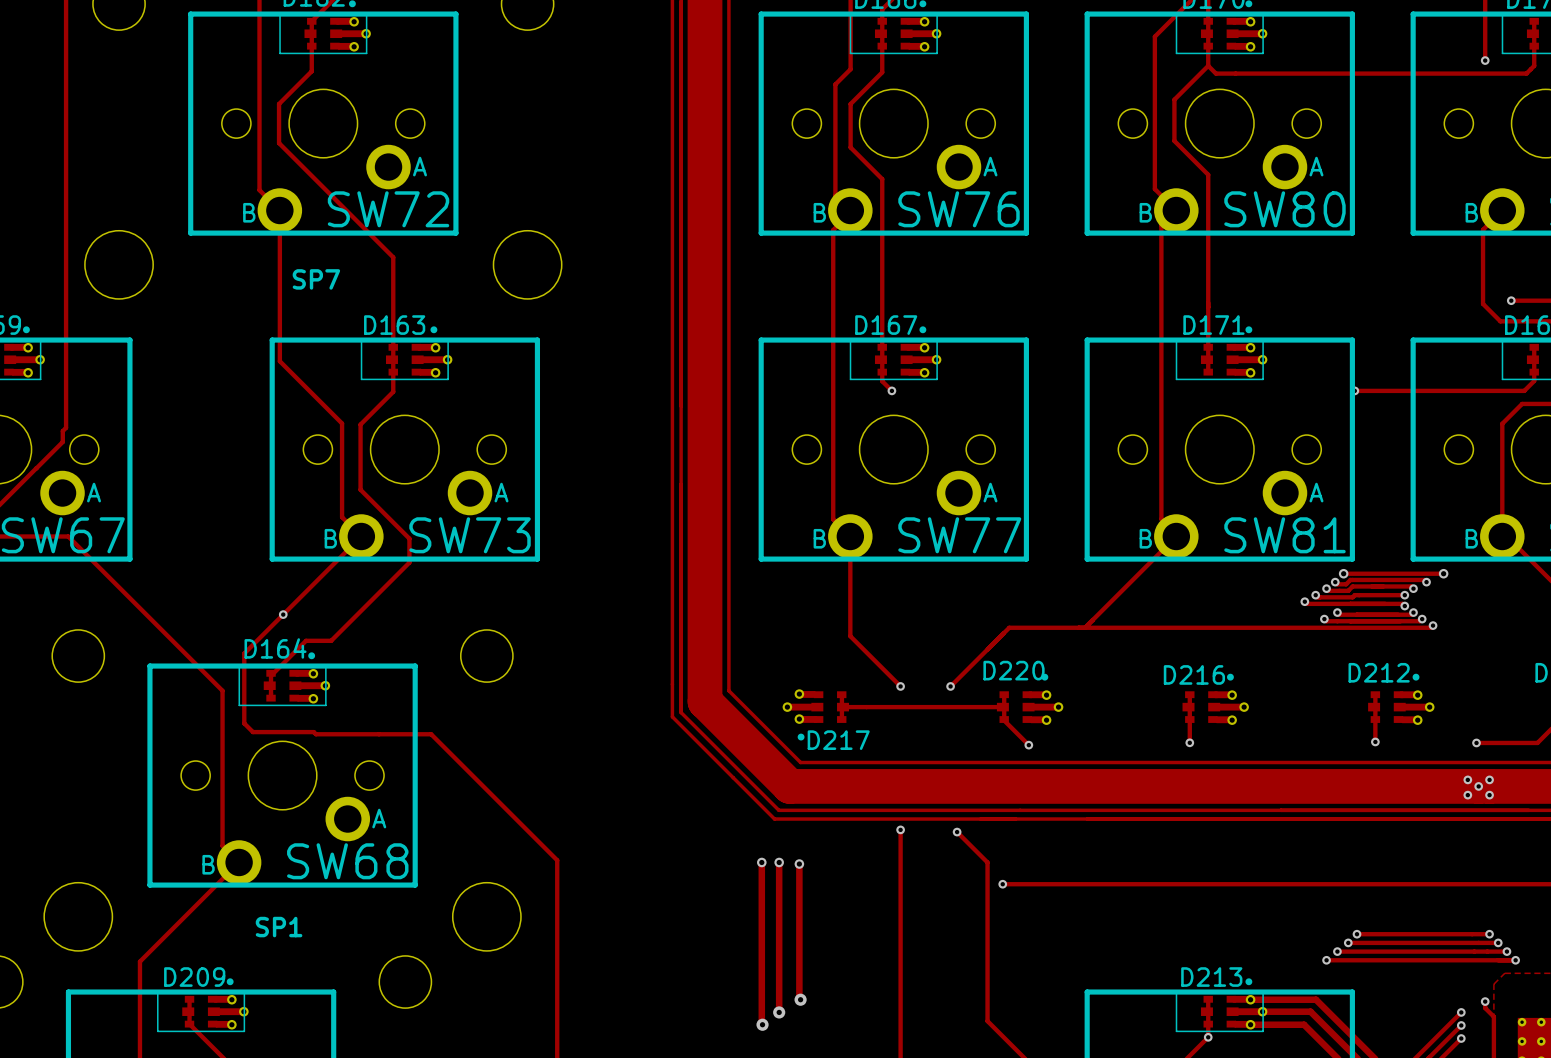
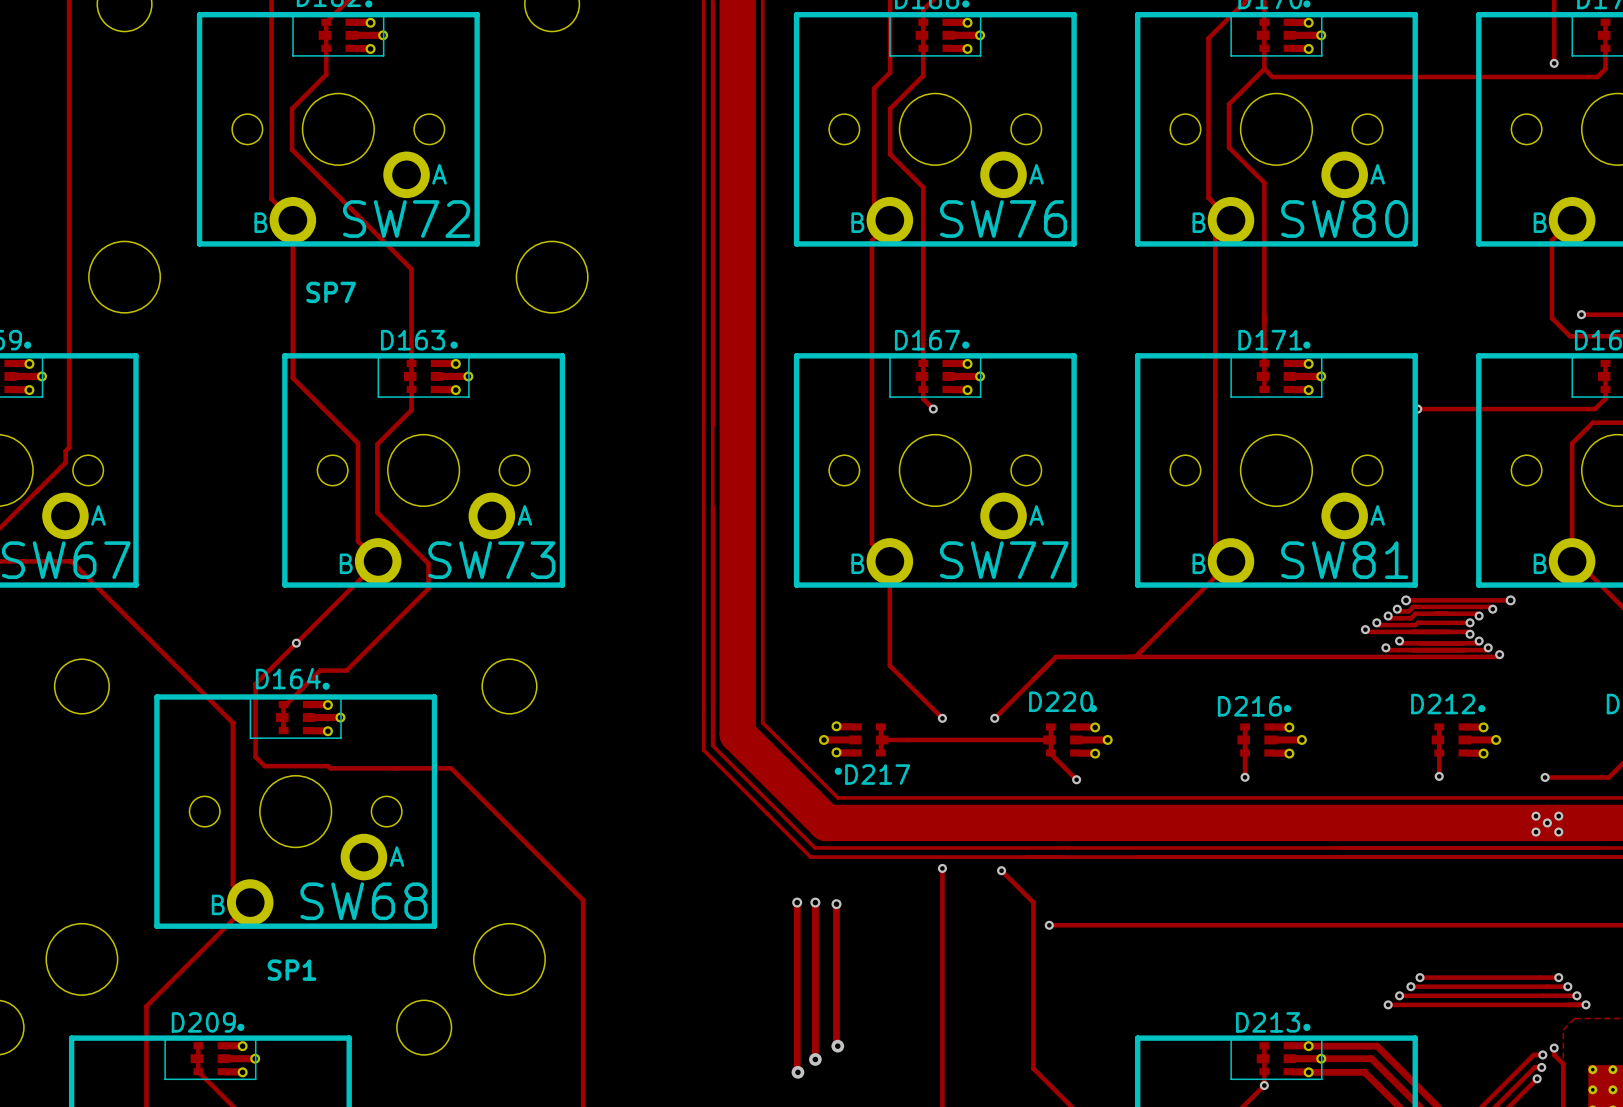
track: none -> (1542, 1054) (1533, 1054) (1529, 1059)
via: none -> (1542, 1054)
via: (1461, 1012) -> none
track: none -> (1541, 1067) (1534, 1067) (1529, 1073)
via: none -> (1541, 1067)
via: (1461, 1025) -> none
track: none -> (1537, 1078) (1529, 1086)
via: none -> (1537, 1078)
via: (1461, 1038) -> none

